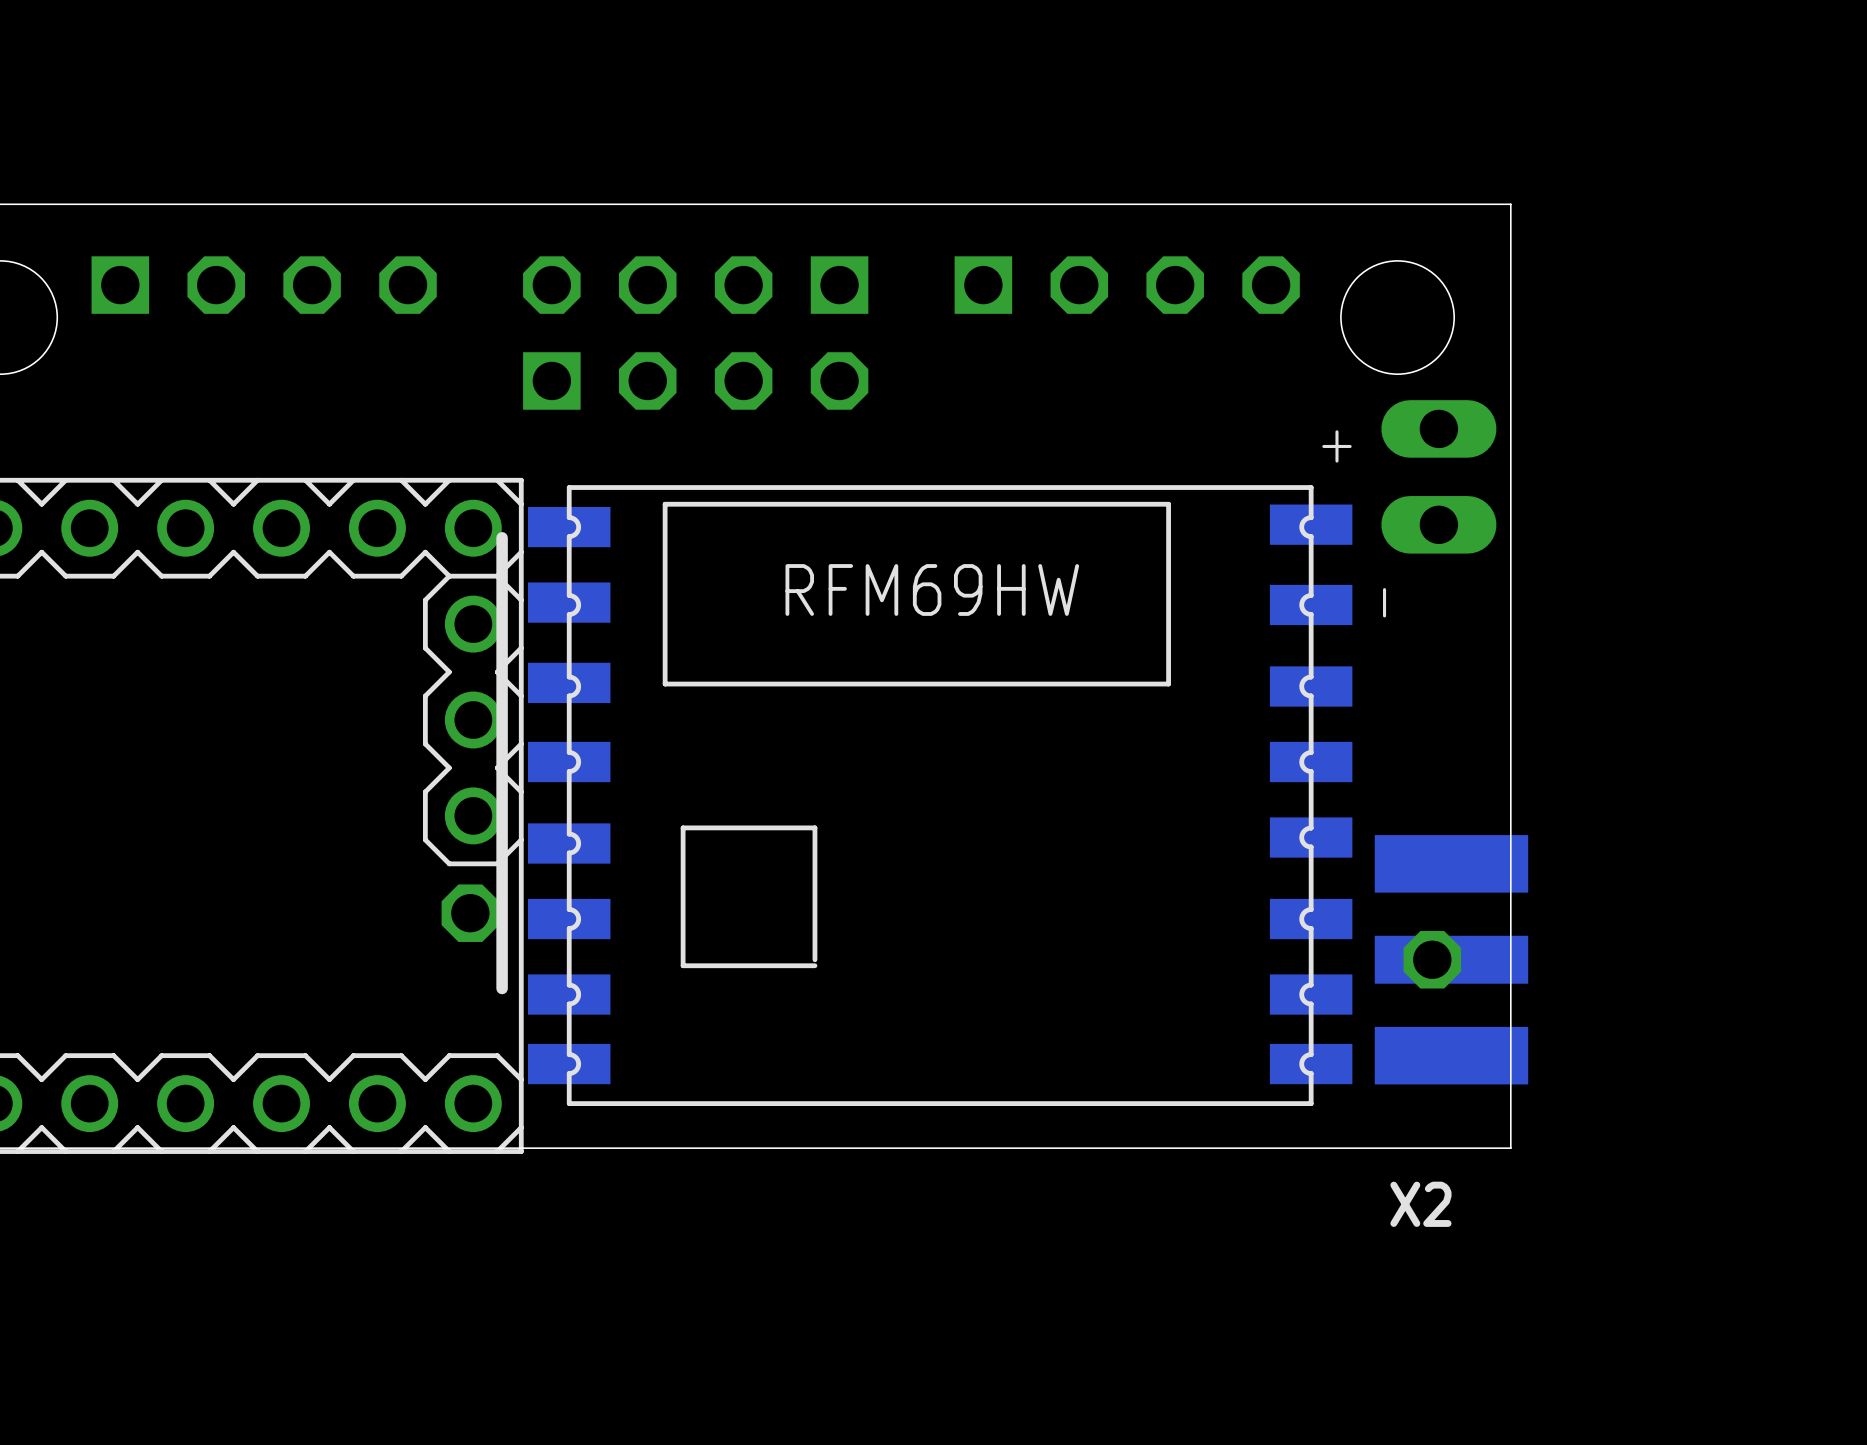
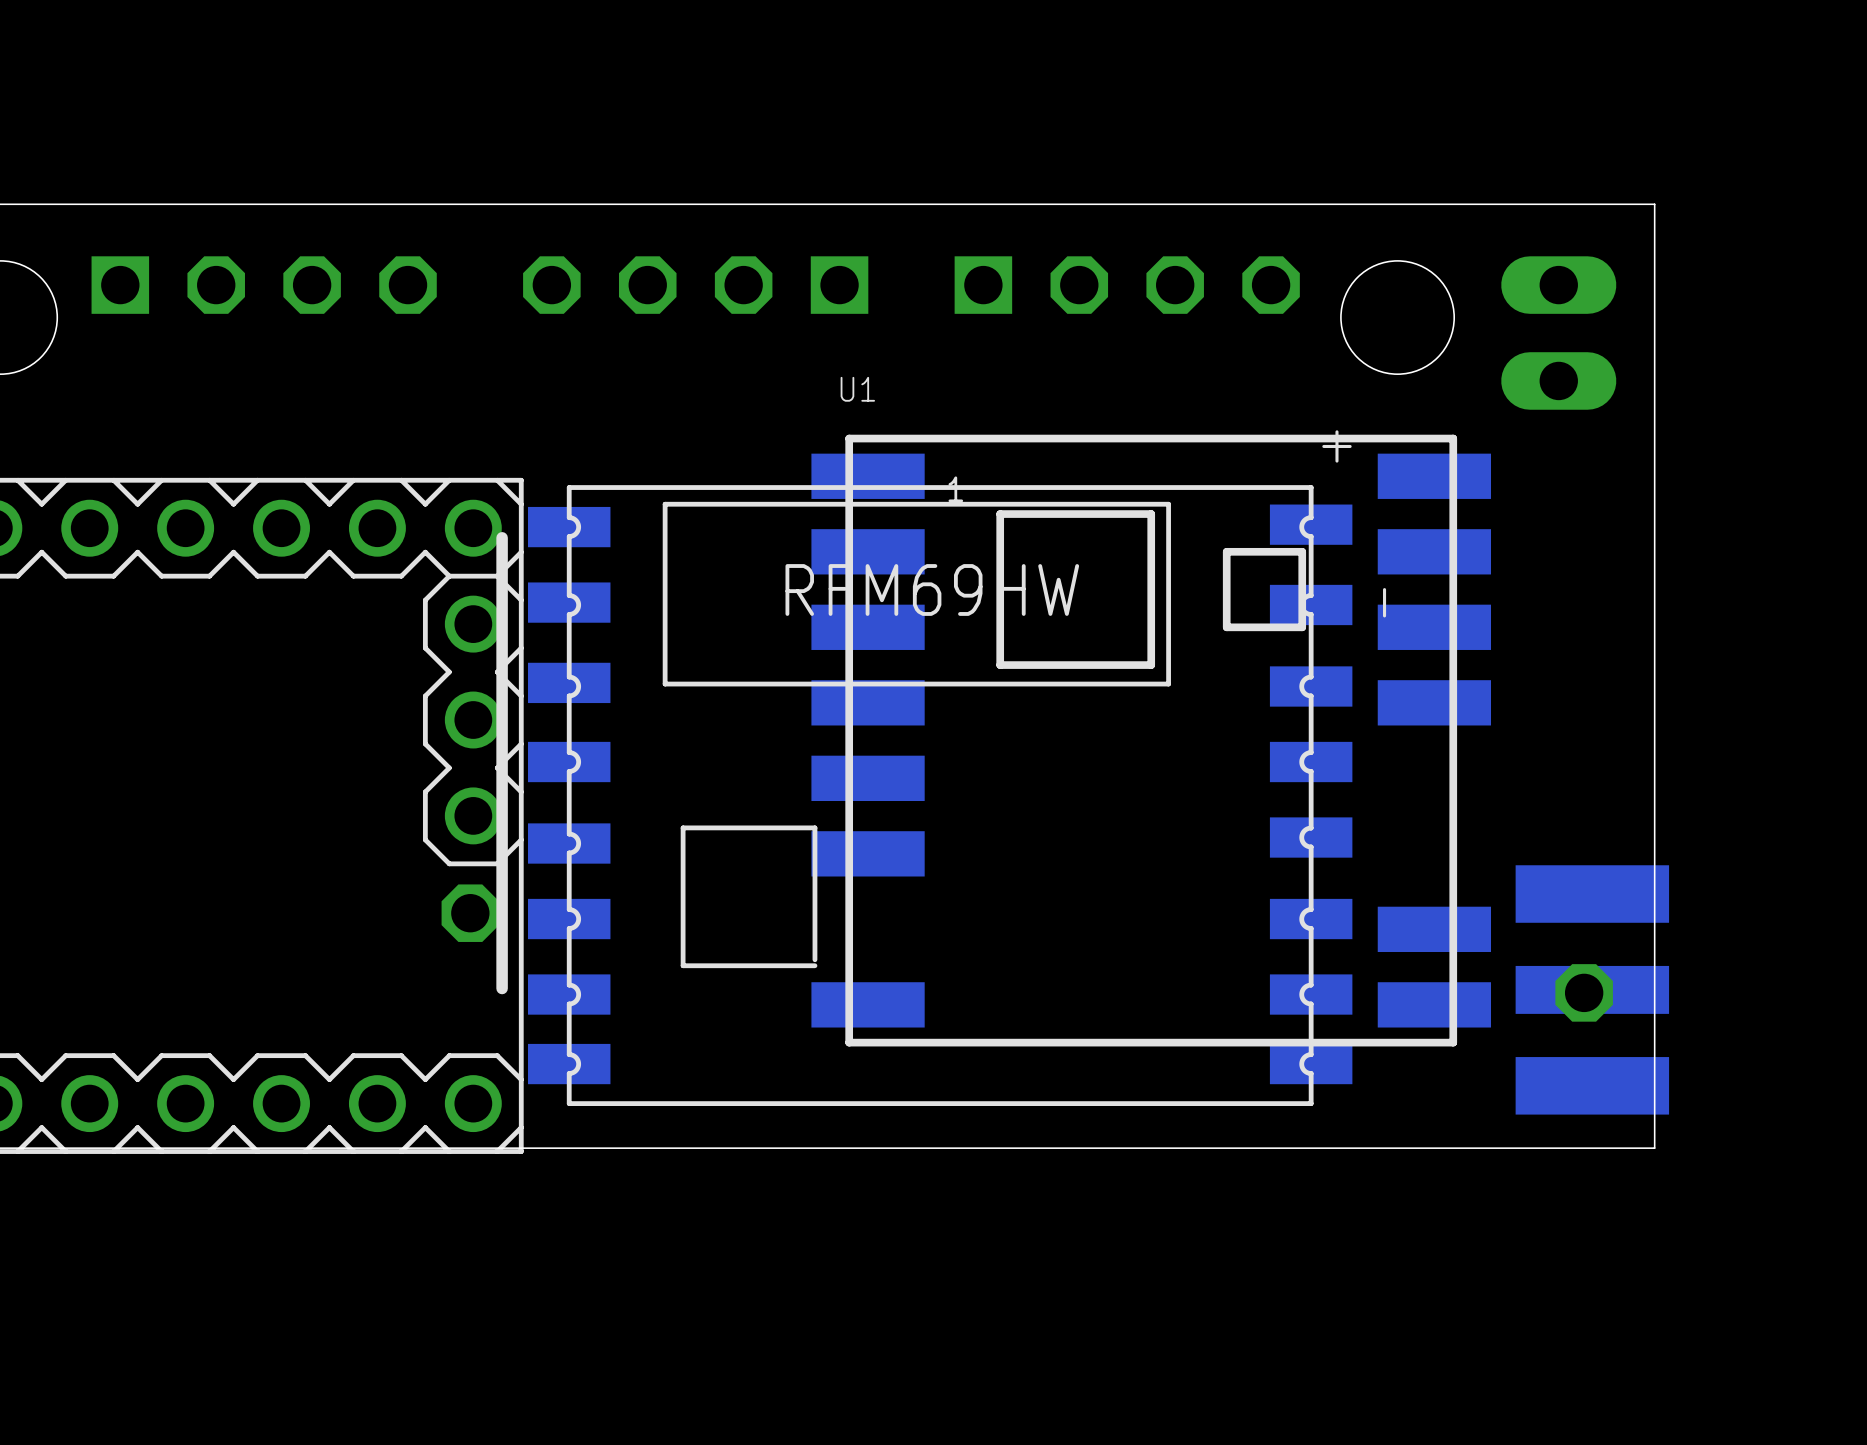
board edge: (1510, 204) (1510, 1148) -> (1510, 204) (1654, 204) (1654, 1148) (1510, 1148)
part: (695, 380) -> none
part position: (1438, 476) -> (1558, 333)
U1: none -> (1151, 740)
part position: (1432, 959) -> (1584, 992)
X2: (1451, 959) -> none
part: none -> (1592, 989)

